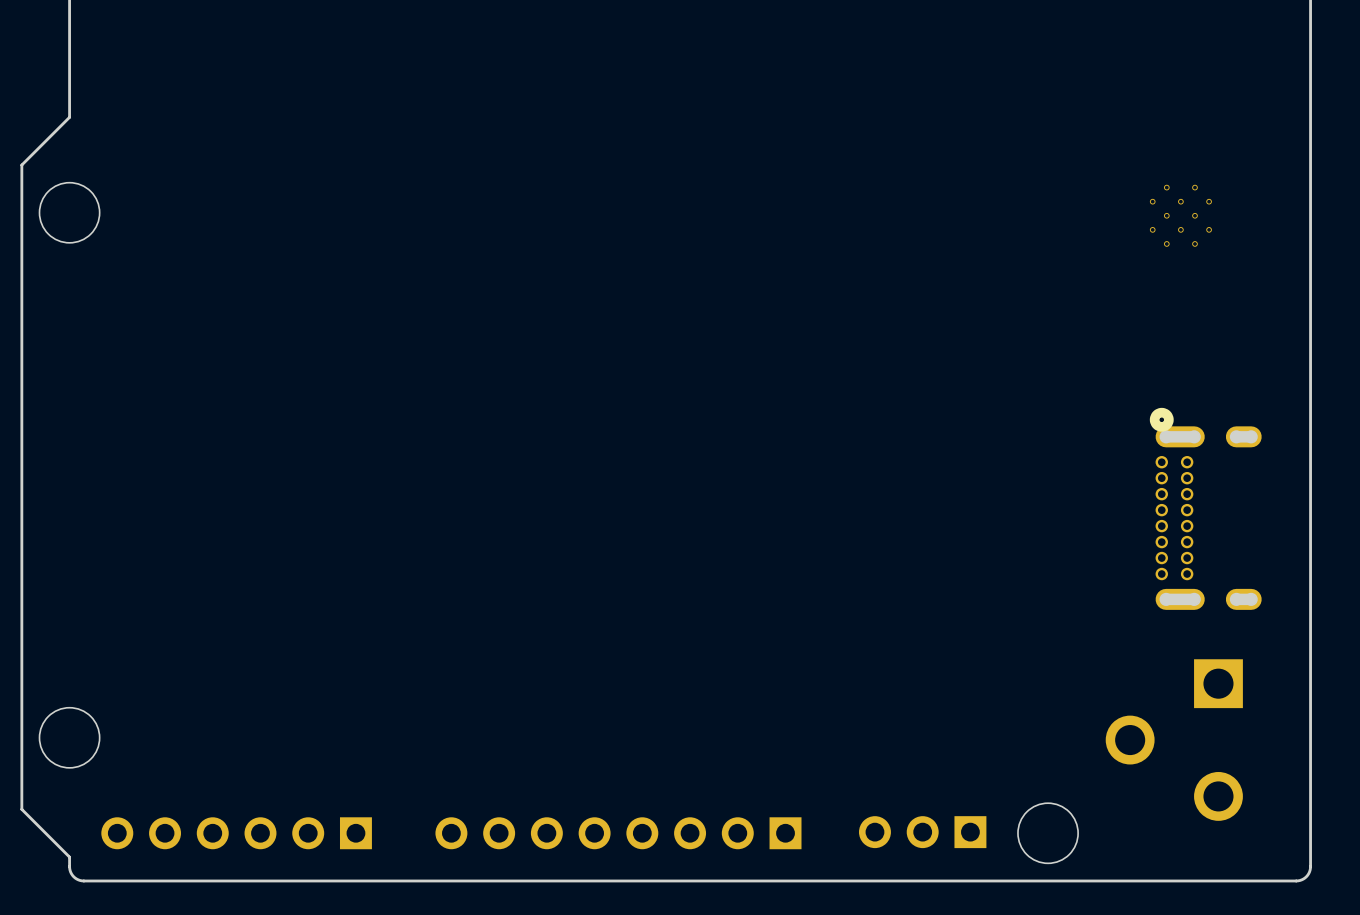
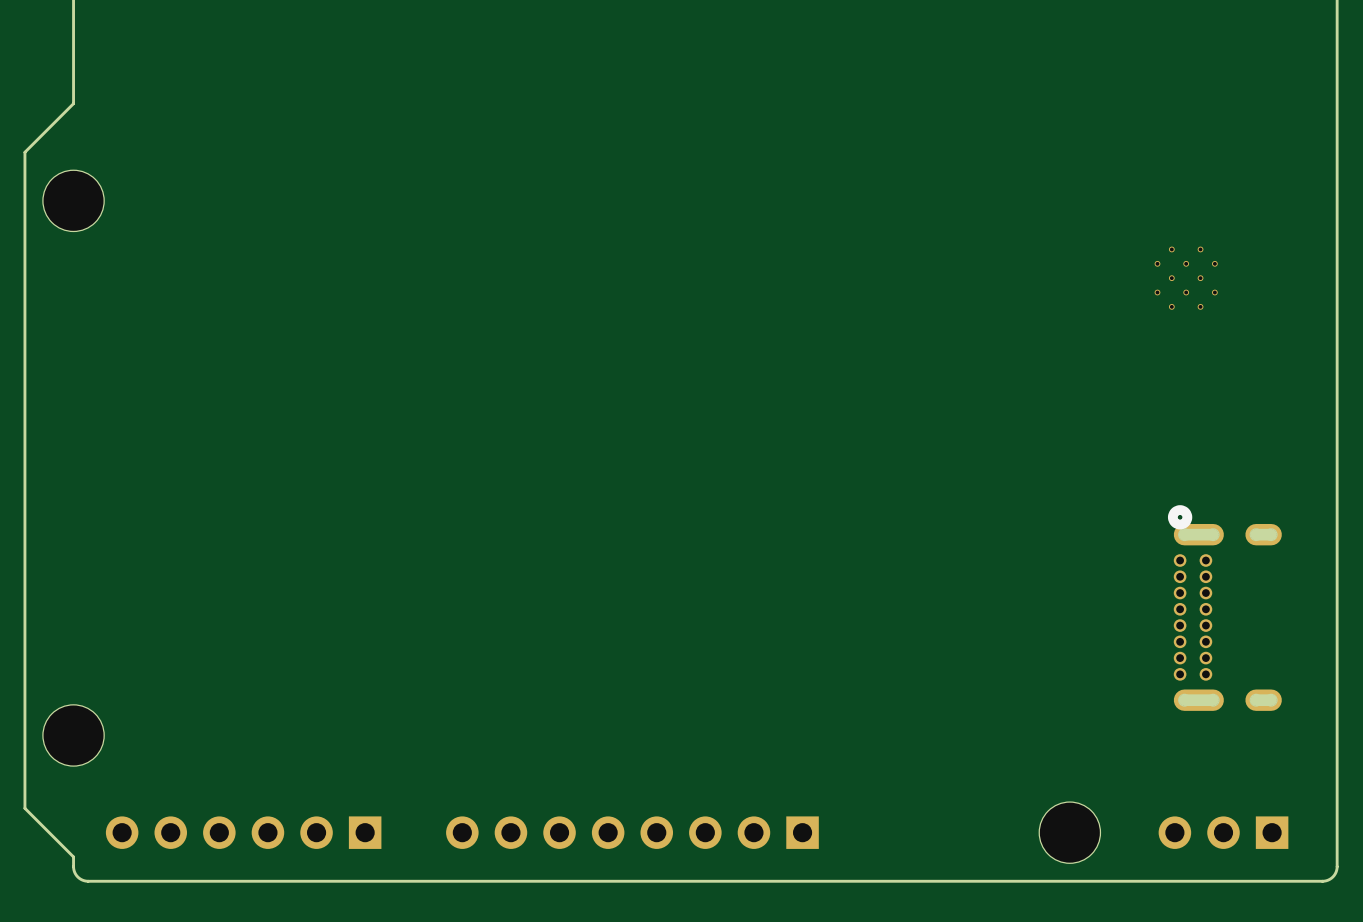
part position: (1180, 215) -> (1186, 278)
part position: (1205, 508) -> (1224, 608)
part: (1174, 740) -> none
part position: (922, 832) -> (1223, 832)

